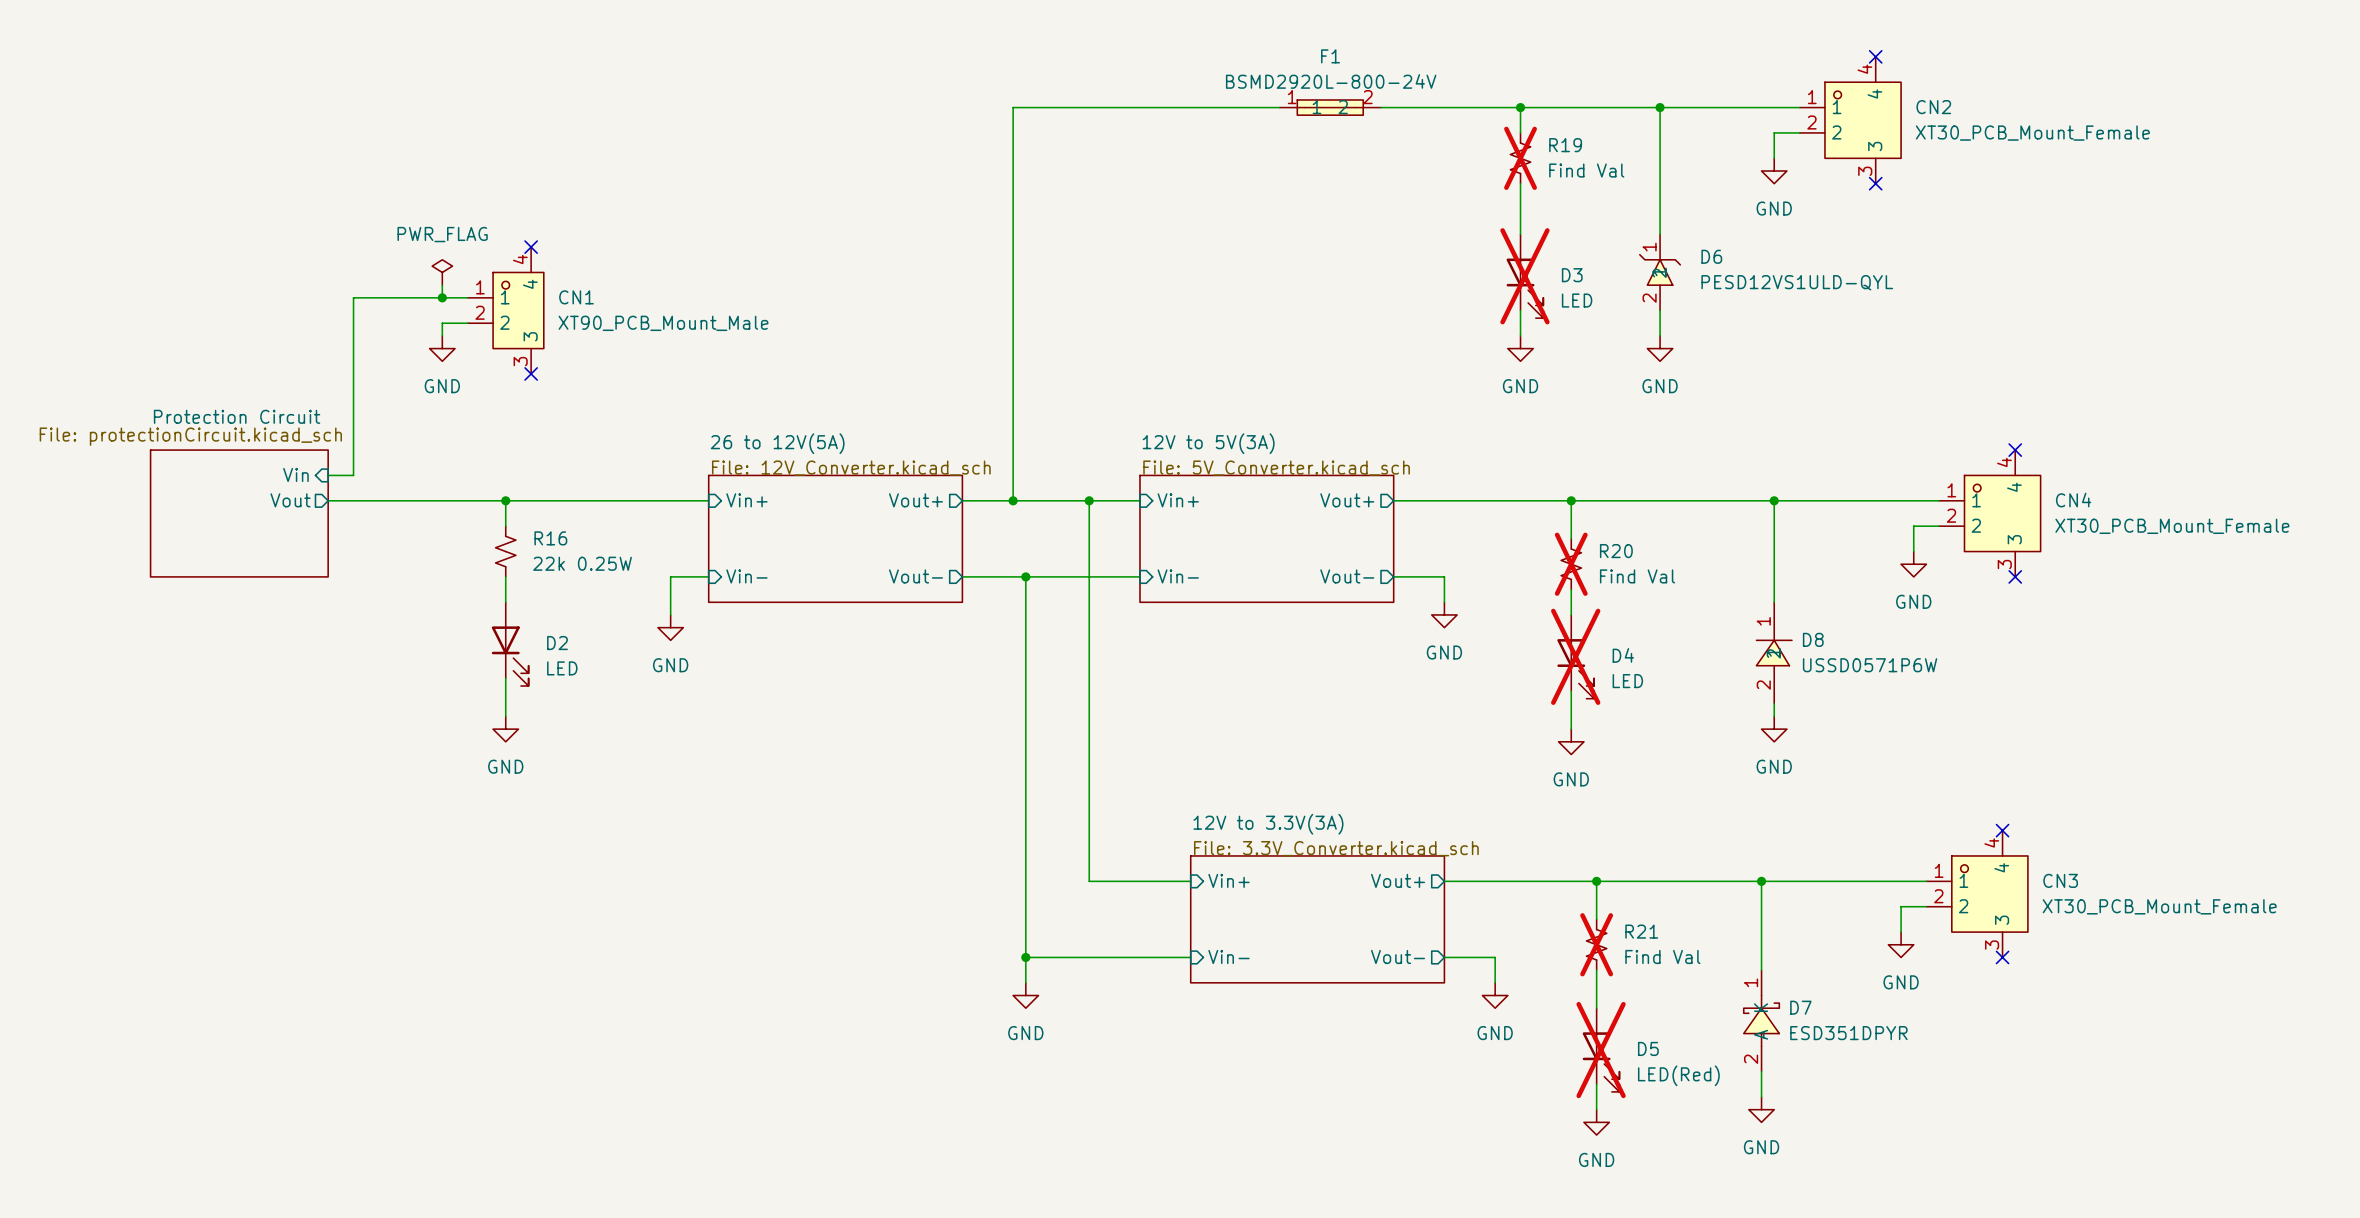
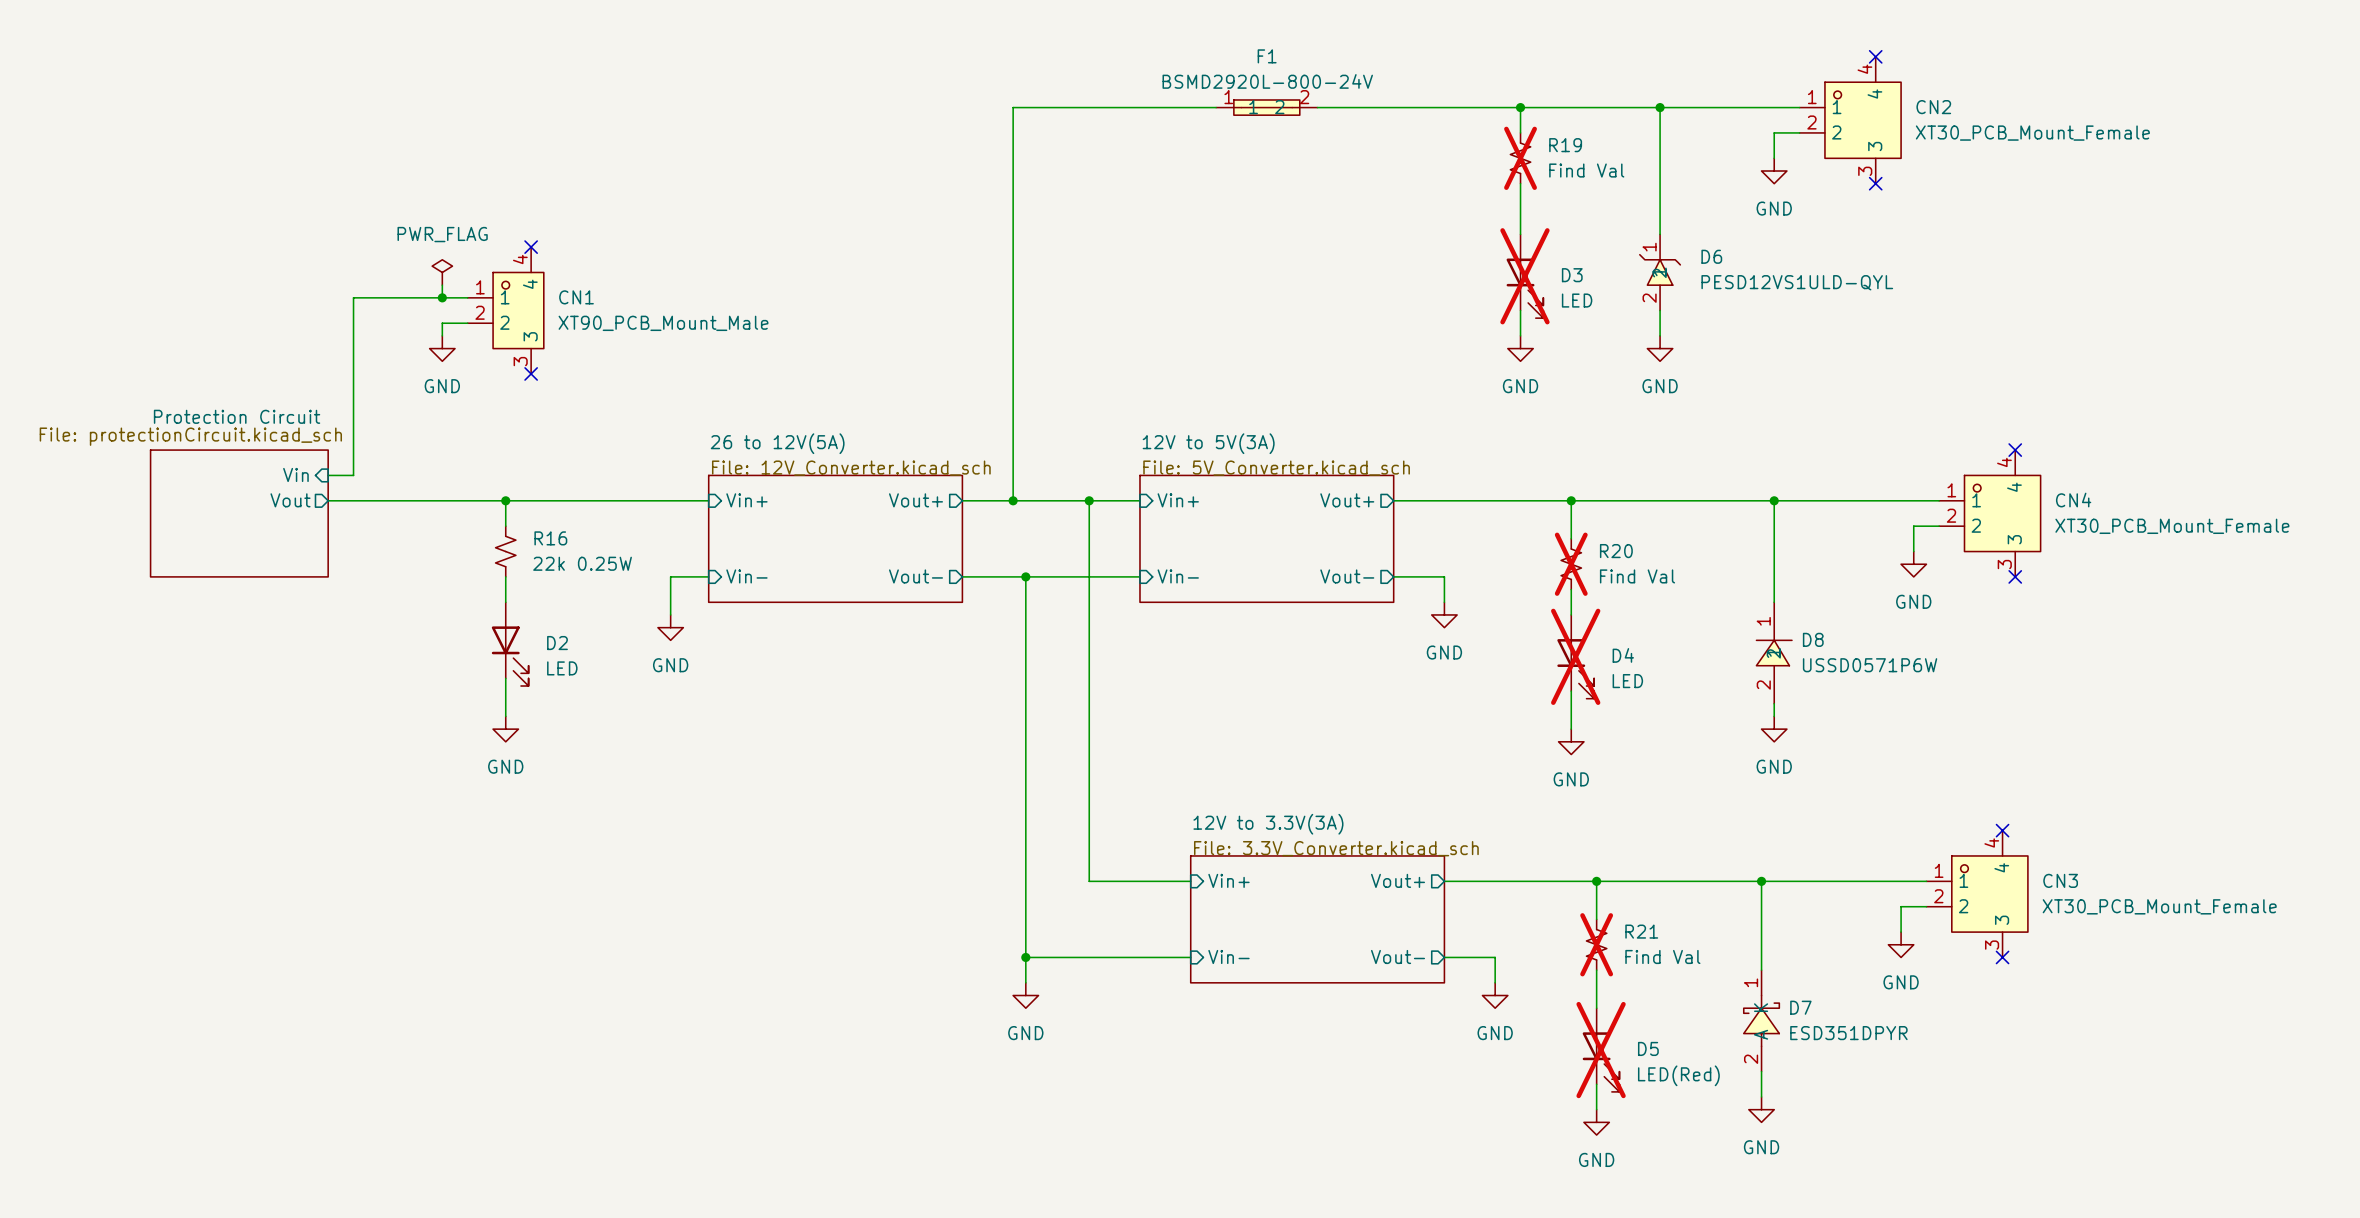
F1 position: (1330, 107) -> (1266, 107)

